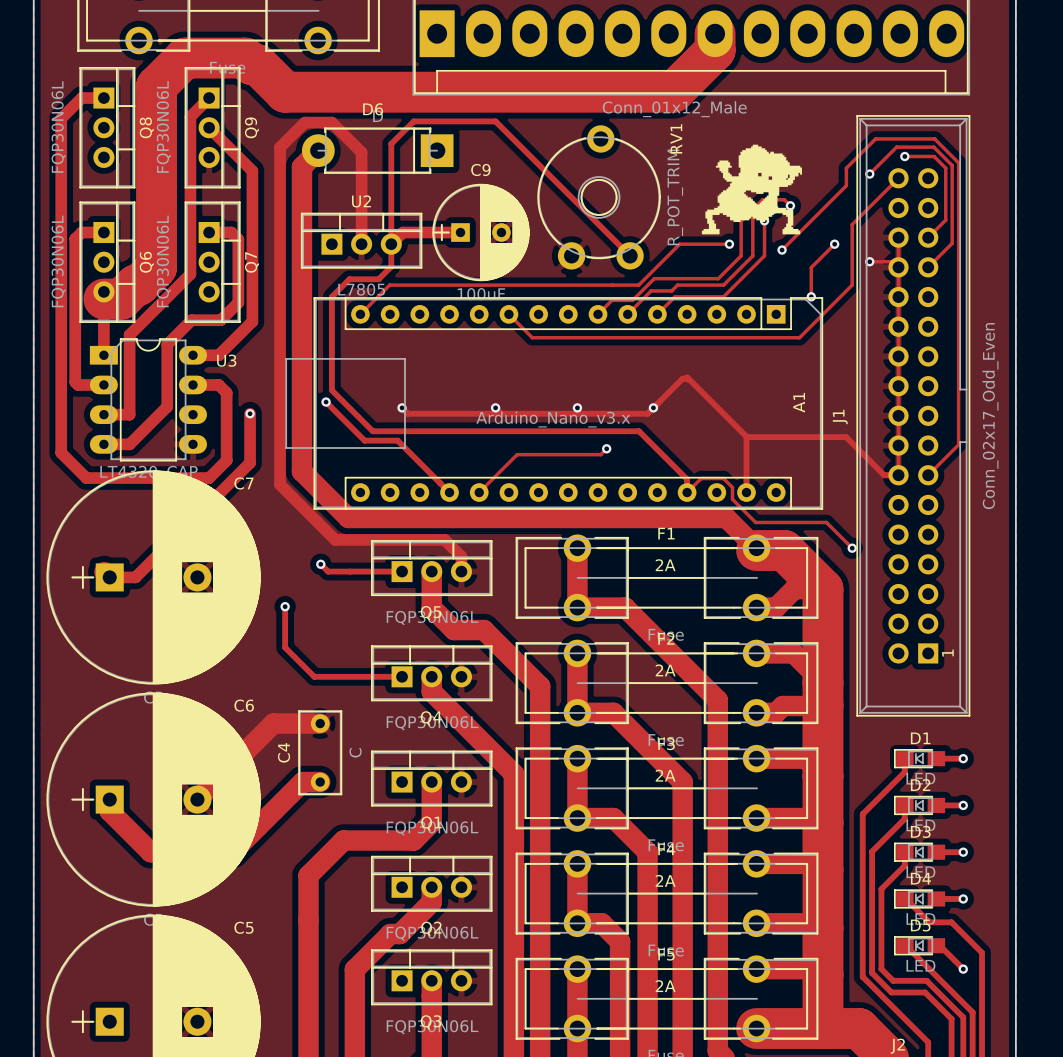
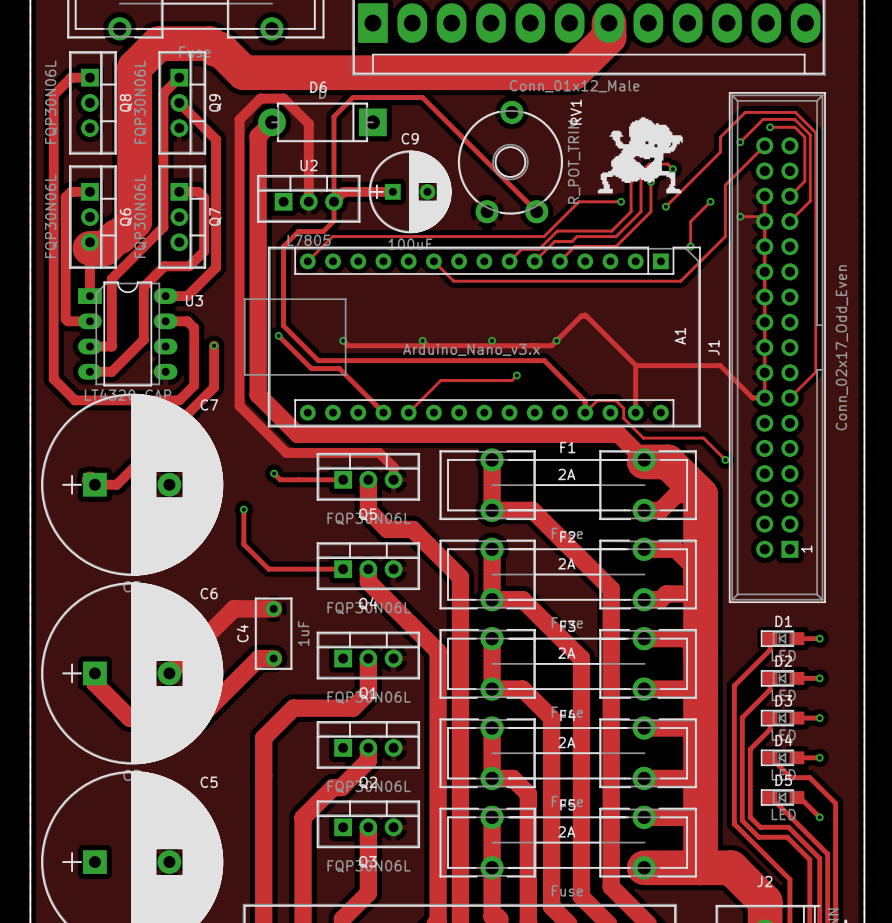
C4 value: C (355, 752) -> 1uF (303, 633)

